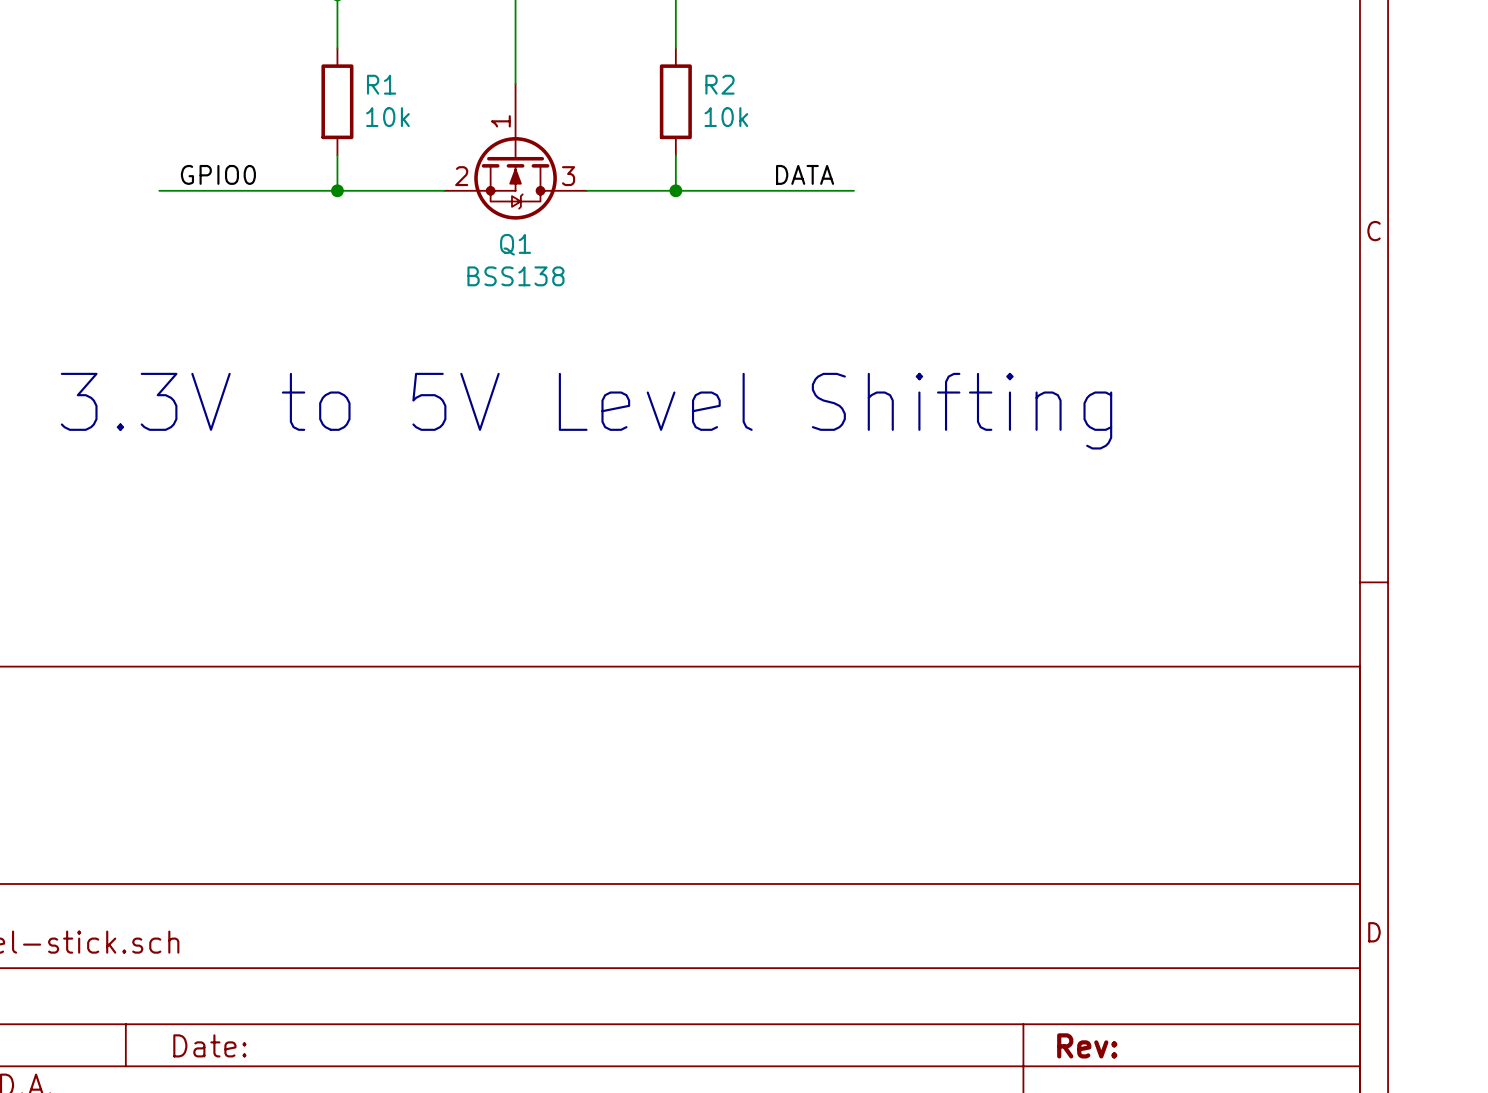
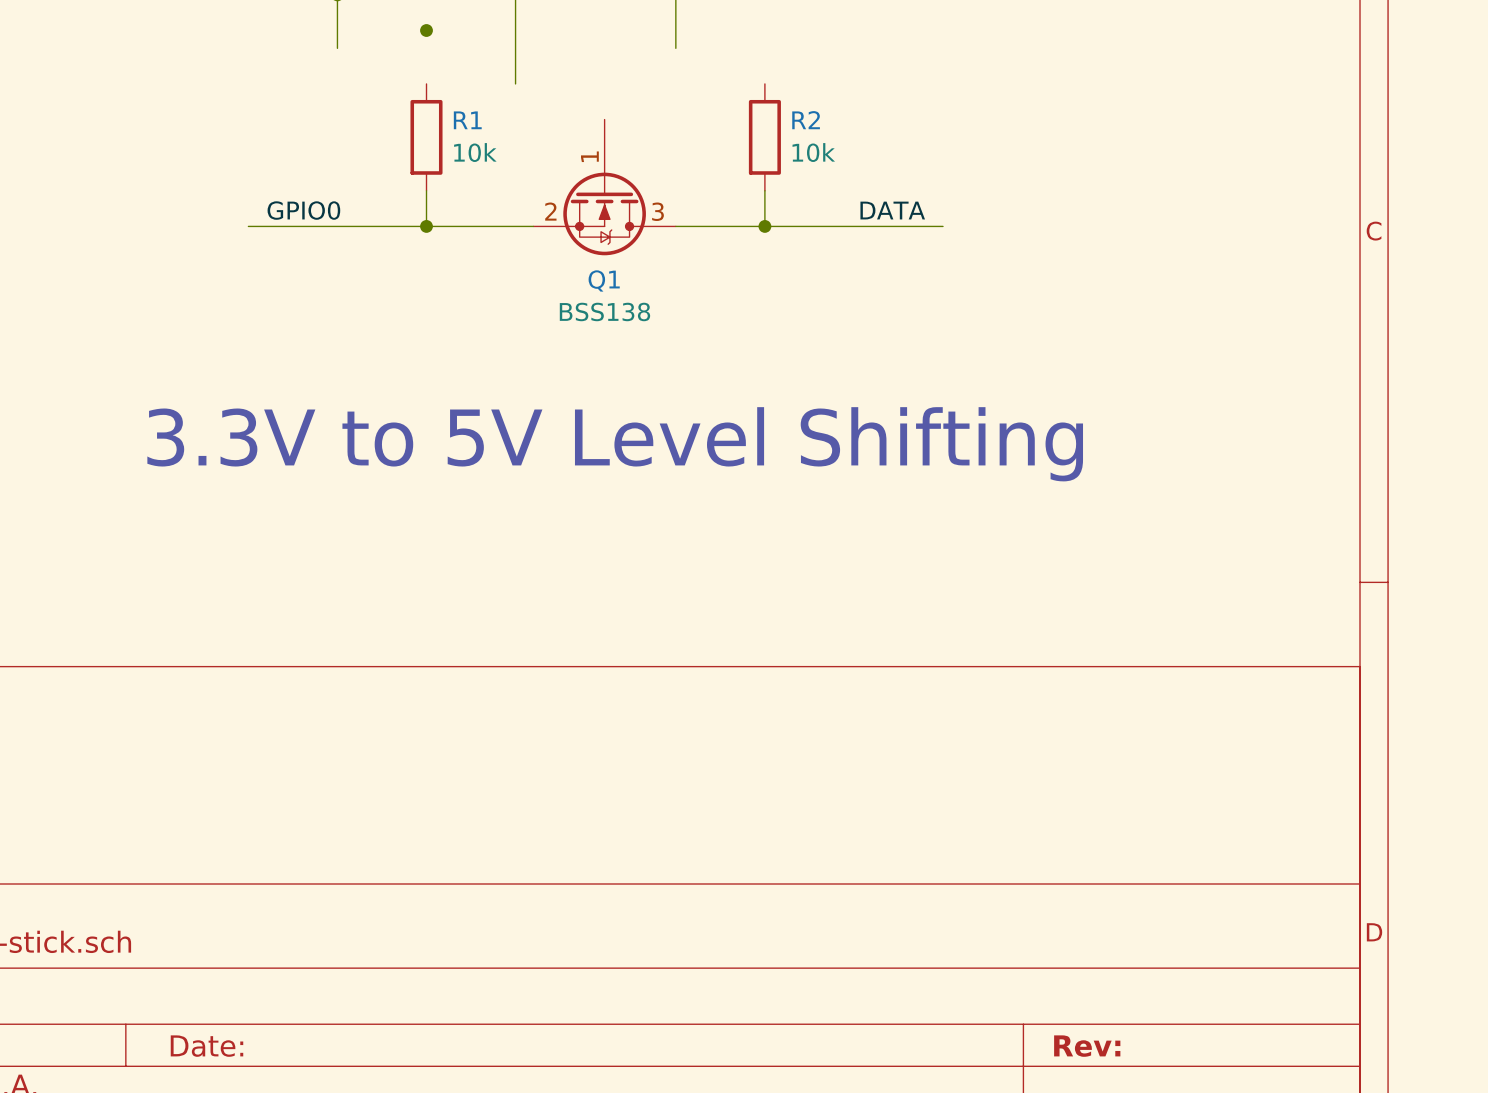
junction: none -> (426, 30)
R1 position: (337, 101) -> (426, 137)
R2 position: (675, 101) -> (764, 137)
Q1 position: (515, 151) -> (604, 187)
wire: (337, 155) (337, 190) -> (426, 190) (426, 226)
wire: (675, 155) (675, 190) -> (764, 190) (764, 226)
label position: GPIO0 (218, 174) -> GPIO0 (303, 210)
label position: DATA (805, 174) -> DATA (892, 210)
wire: (159, 190) (444, 190) -> (248, 226) (533, 226)
junction: (337, 190) -> none
wire: (586, 190) (853, 190) -> (675, 226) (943, 226)
junction: (675, 190) -> none
junction: none -> (426, 226)
junction: none -> (764, 226)
text position: 3.3V to 5V Level Shifting (586, 411) -> 3.3V to 5V Level Shifting (615, 444)

